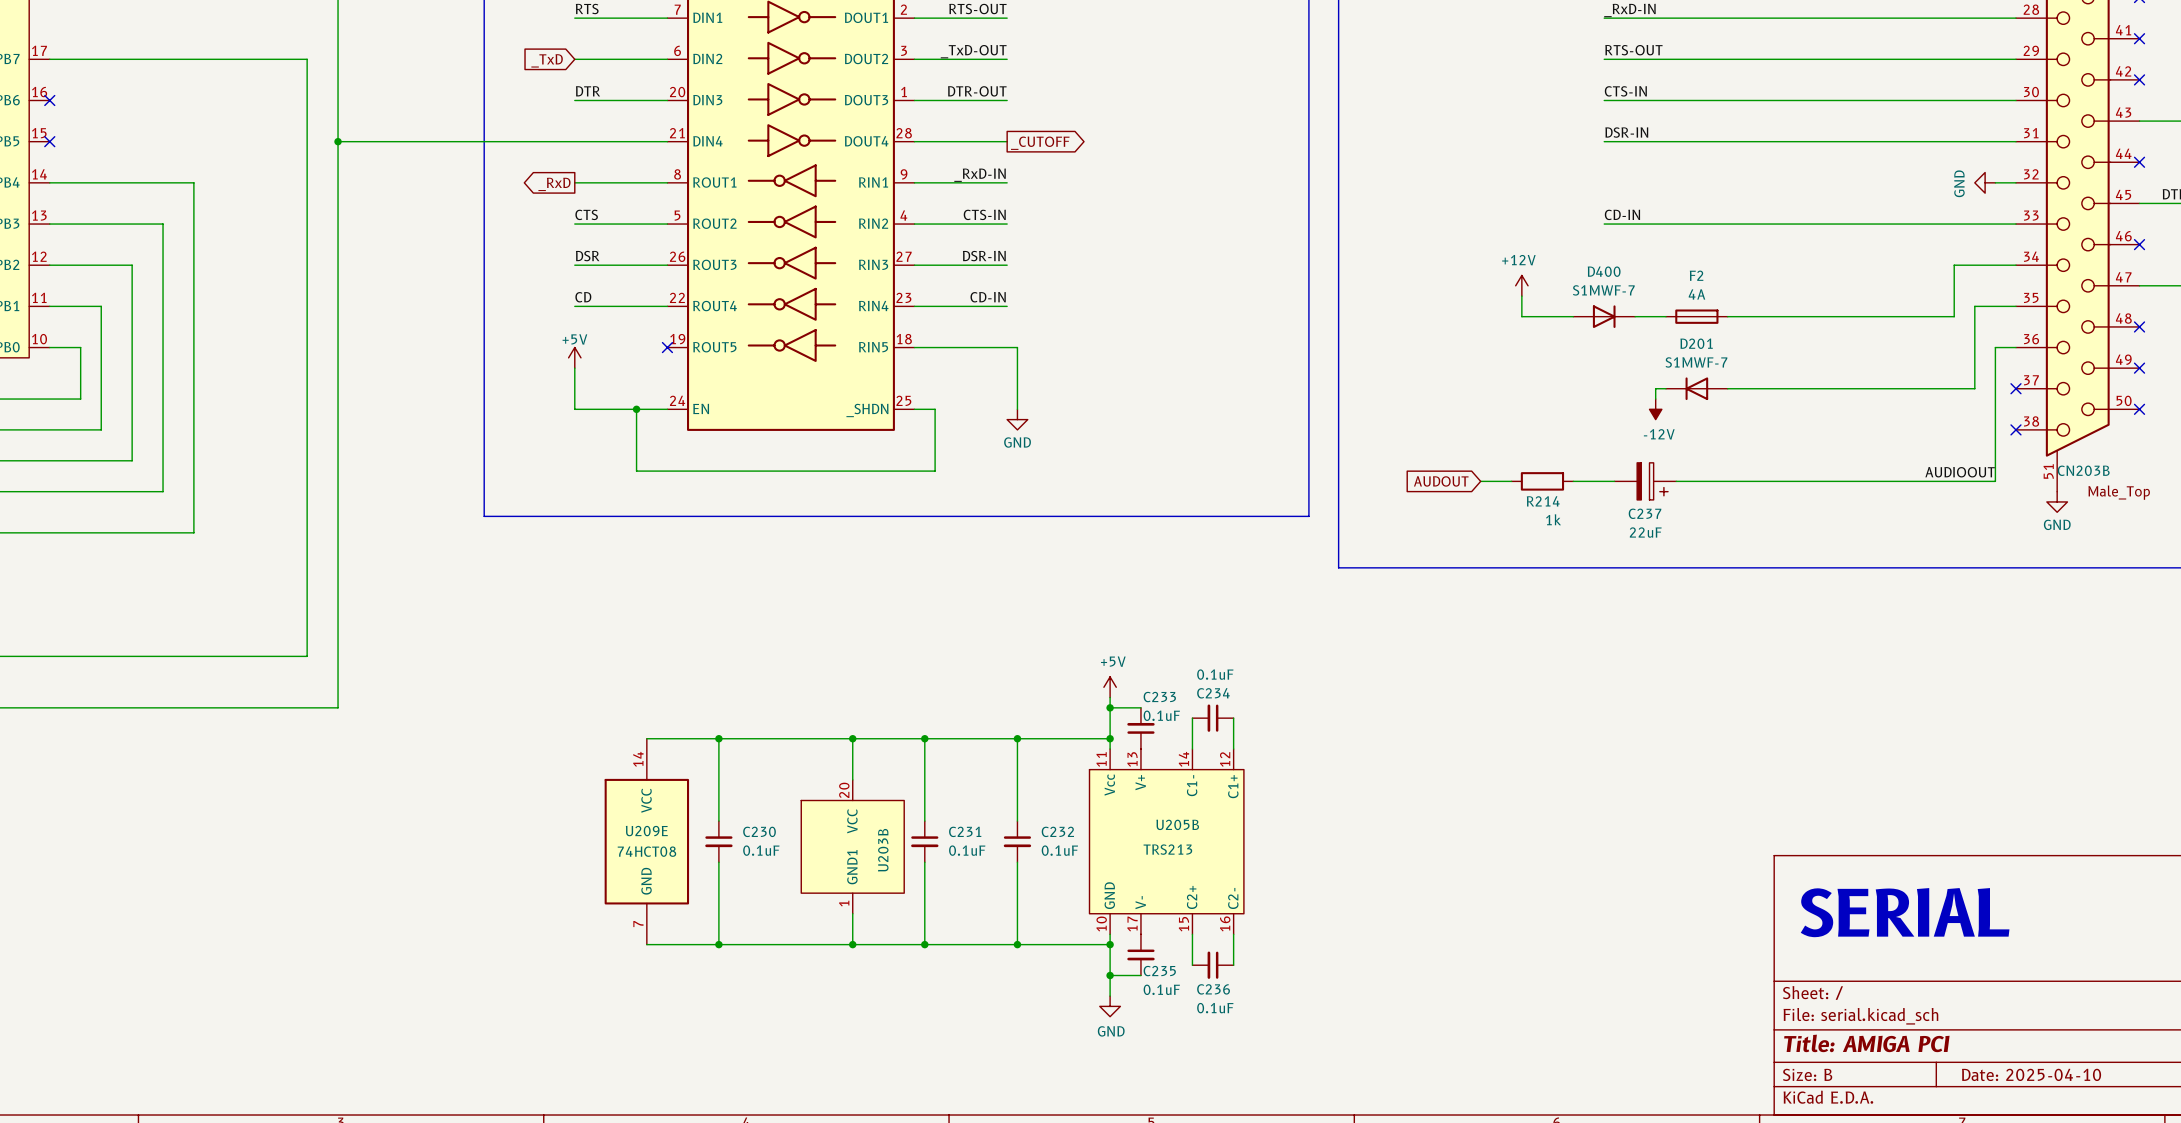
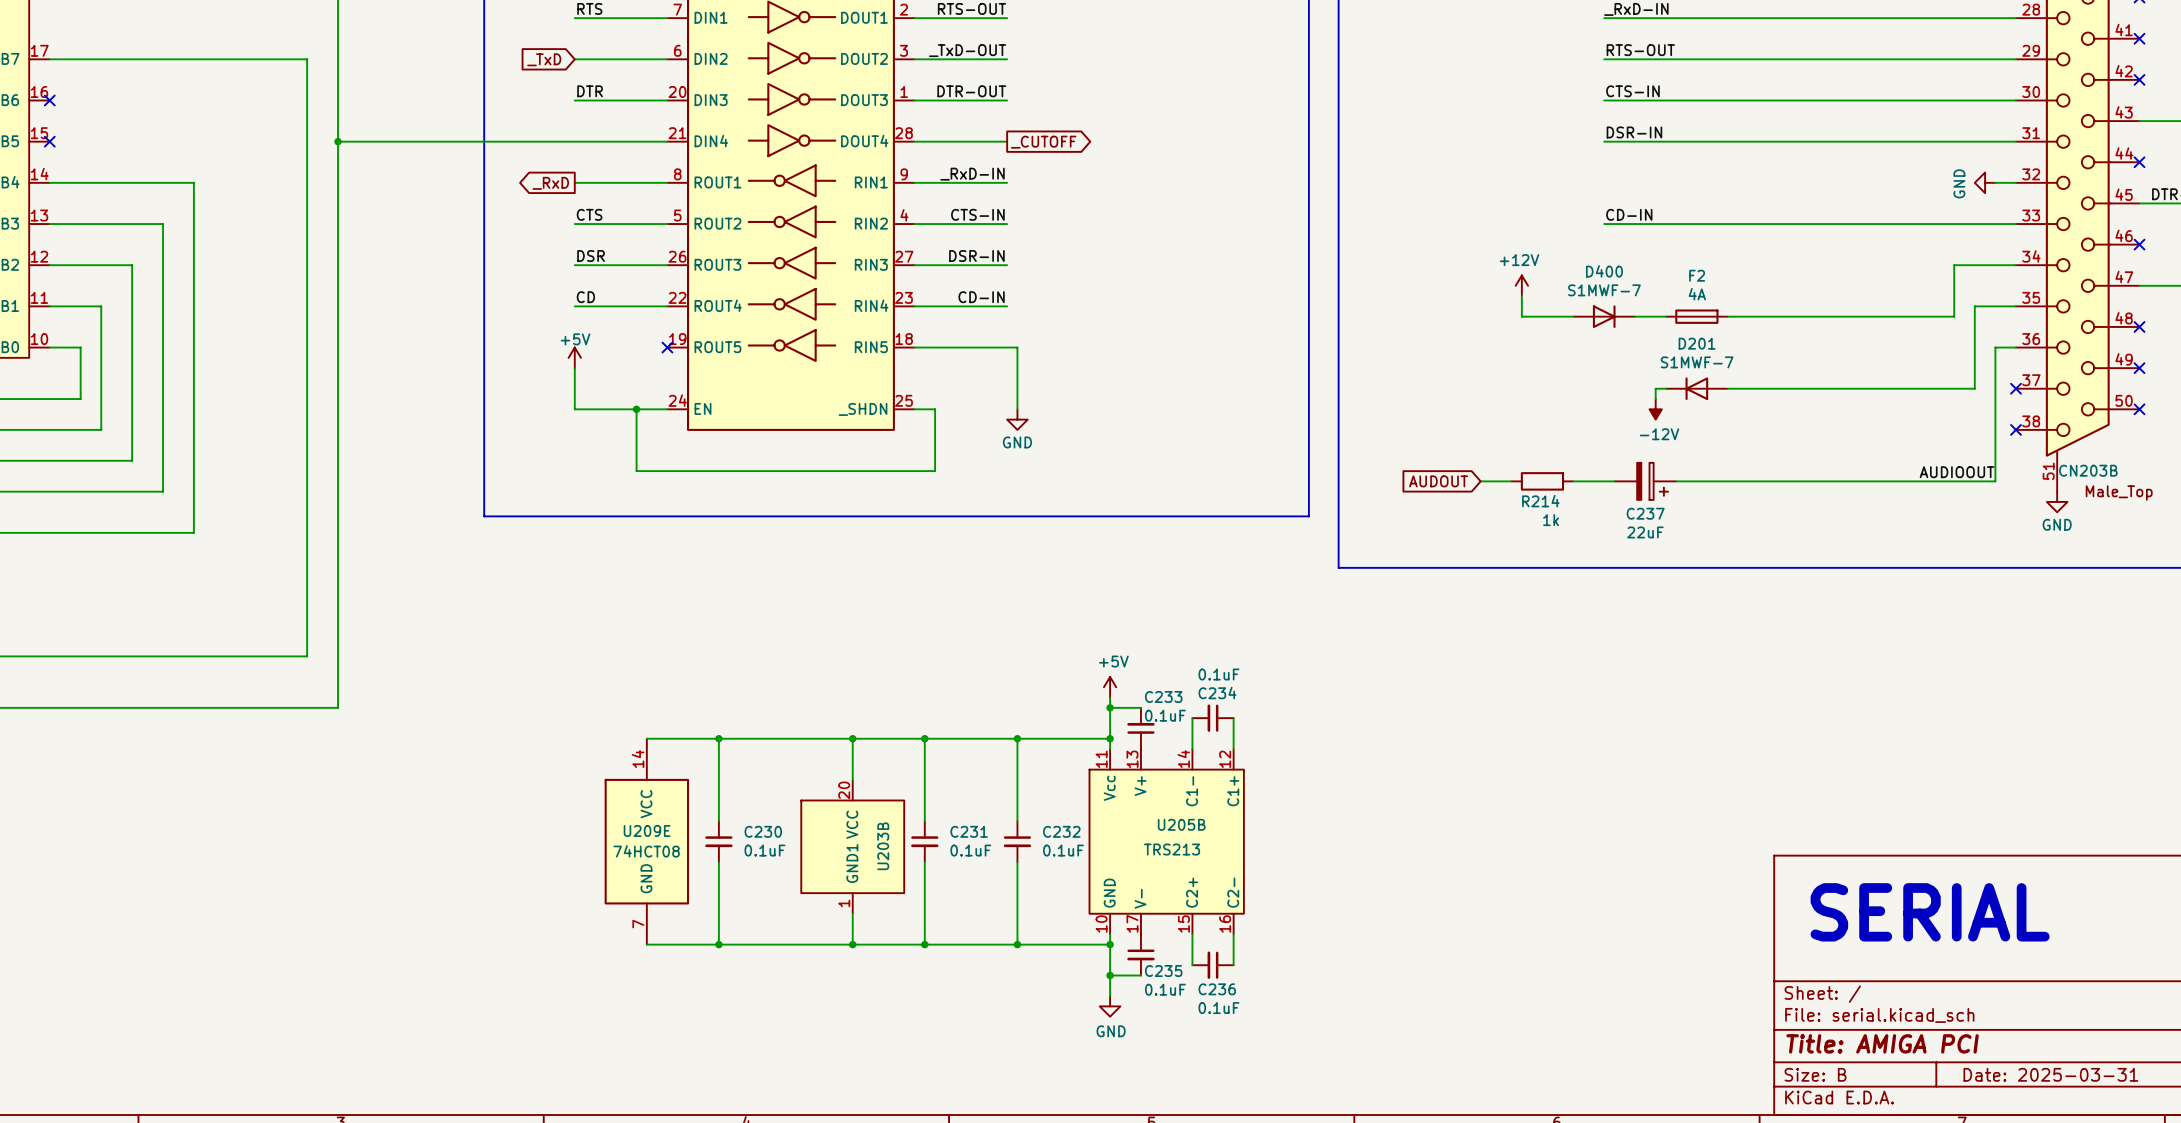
title block: Date: 2025-04-10 (2031, 1074) -> Date: 2025-03-31 (2050, 1074)

